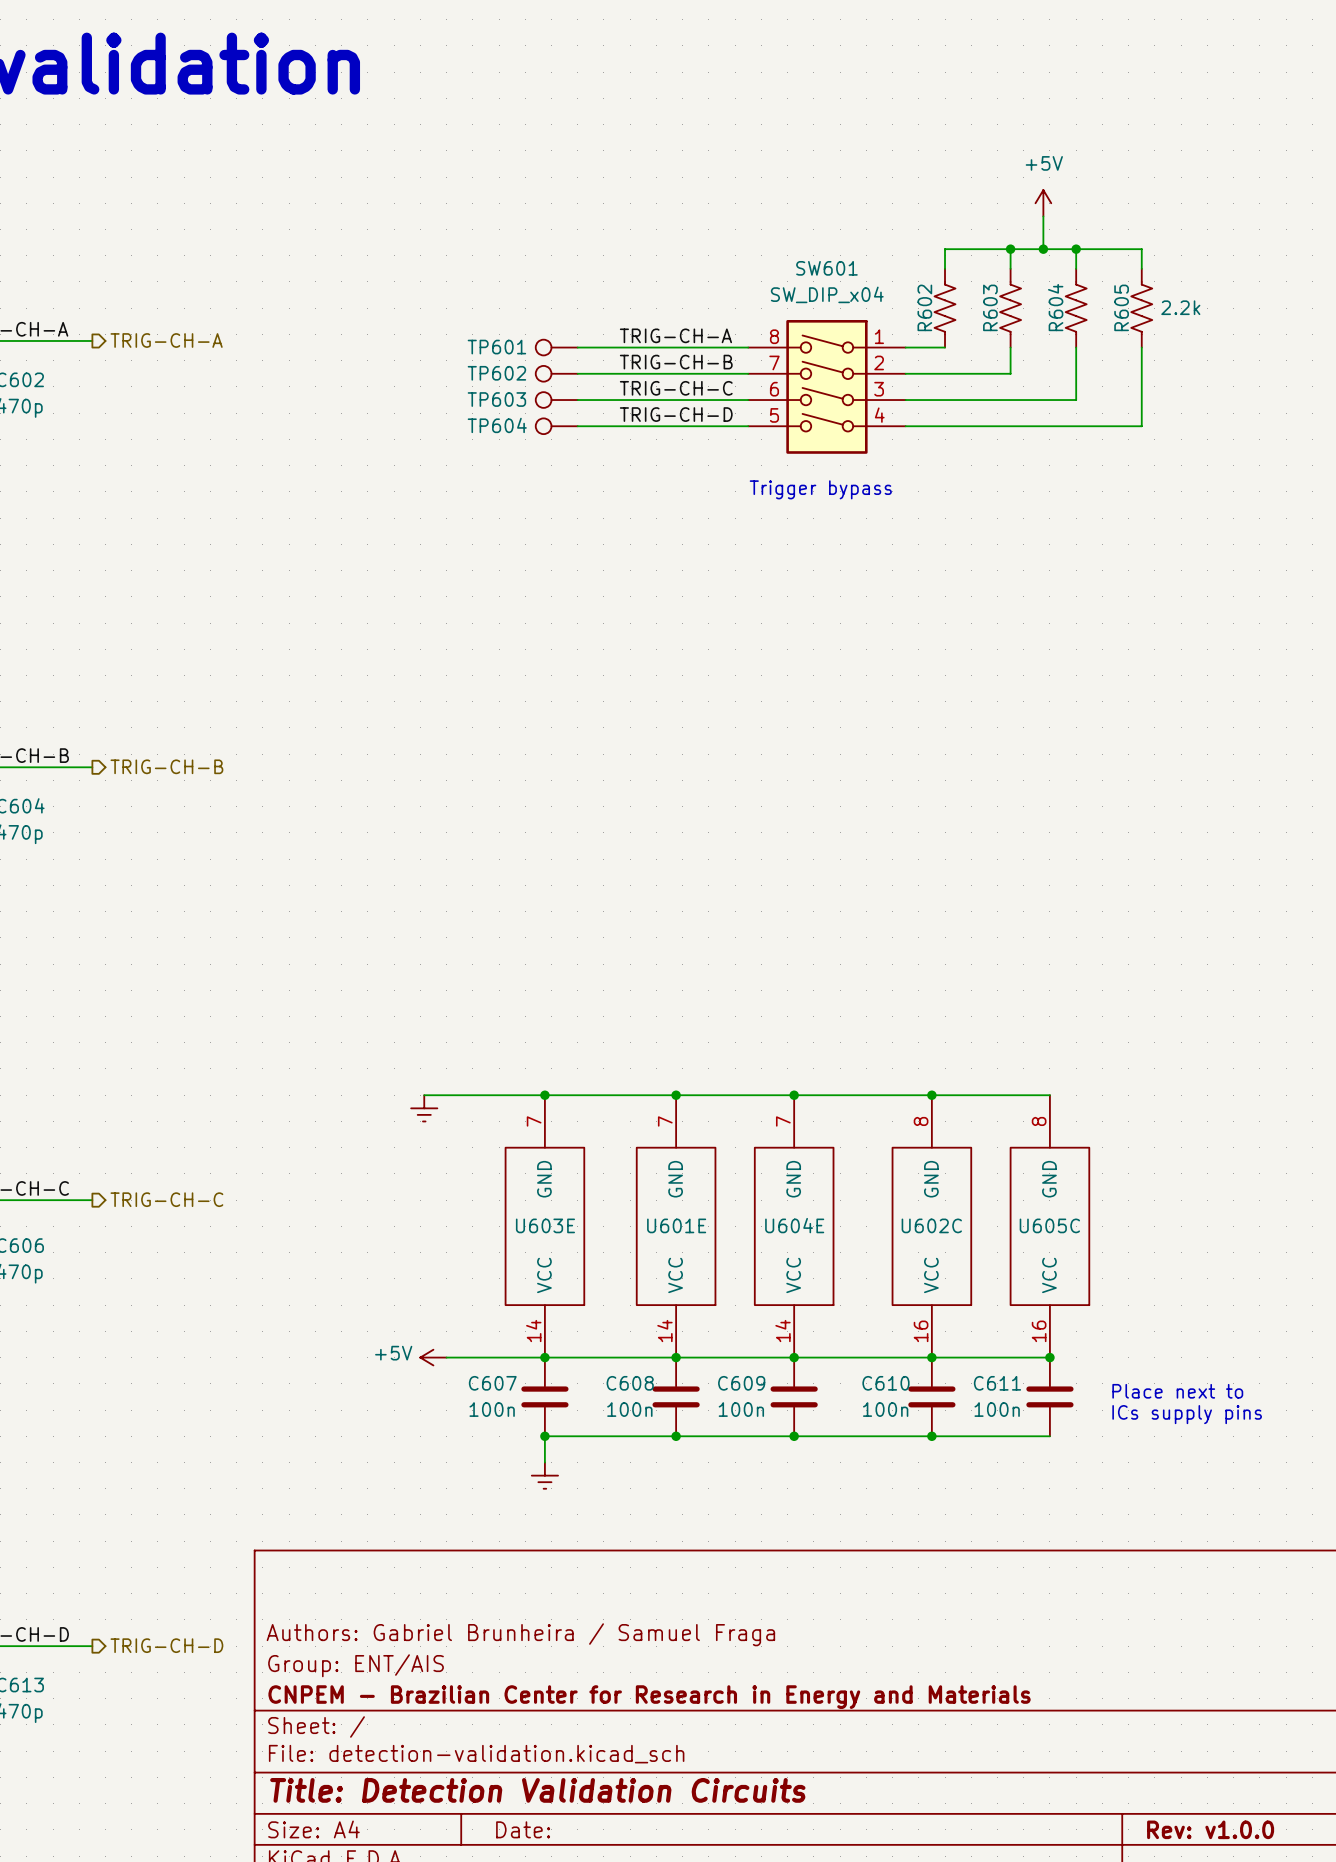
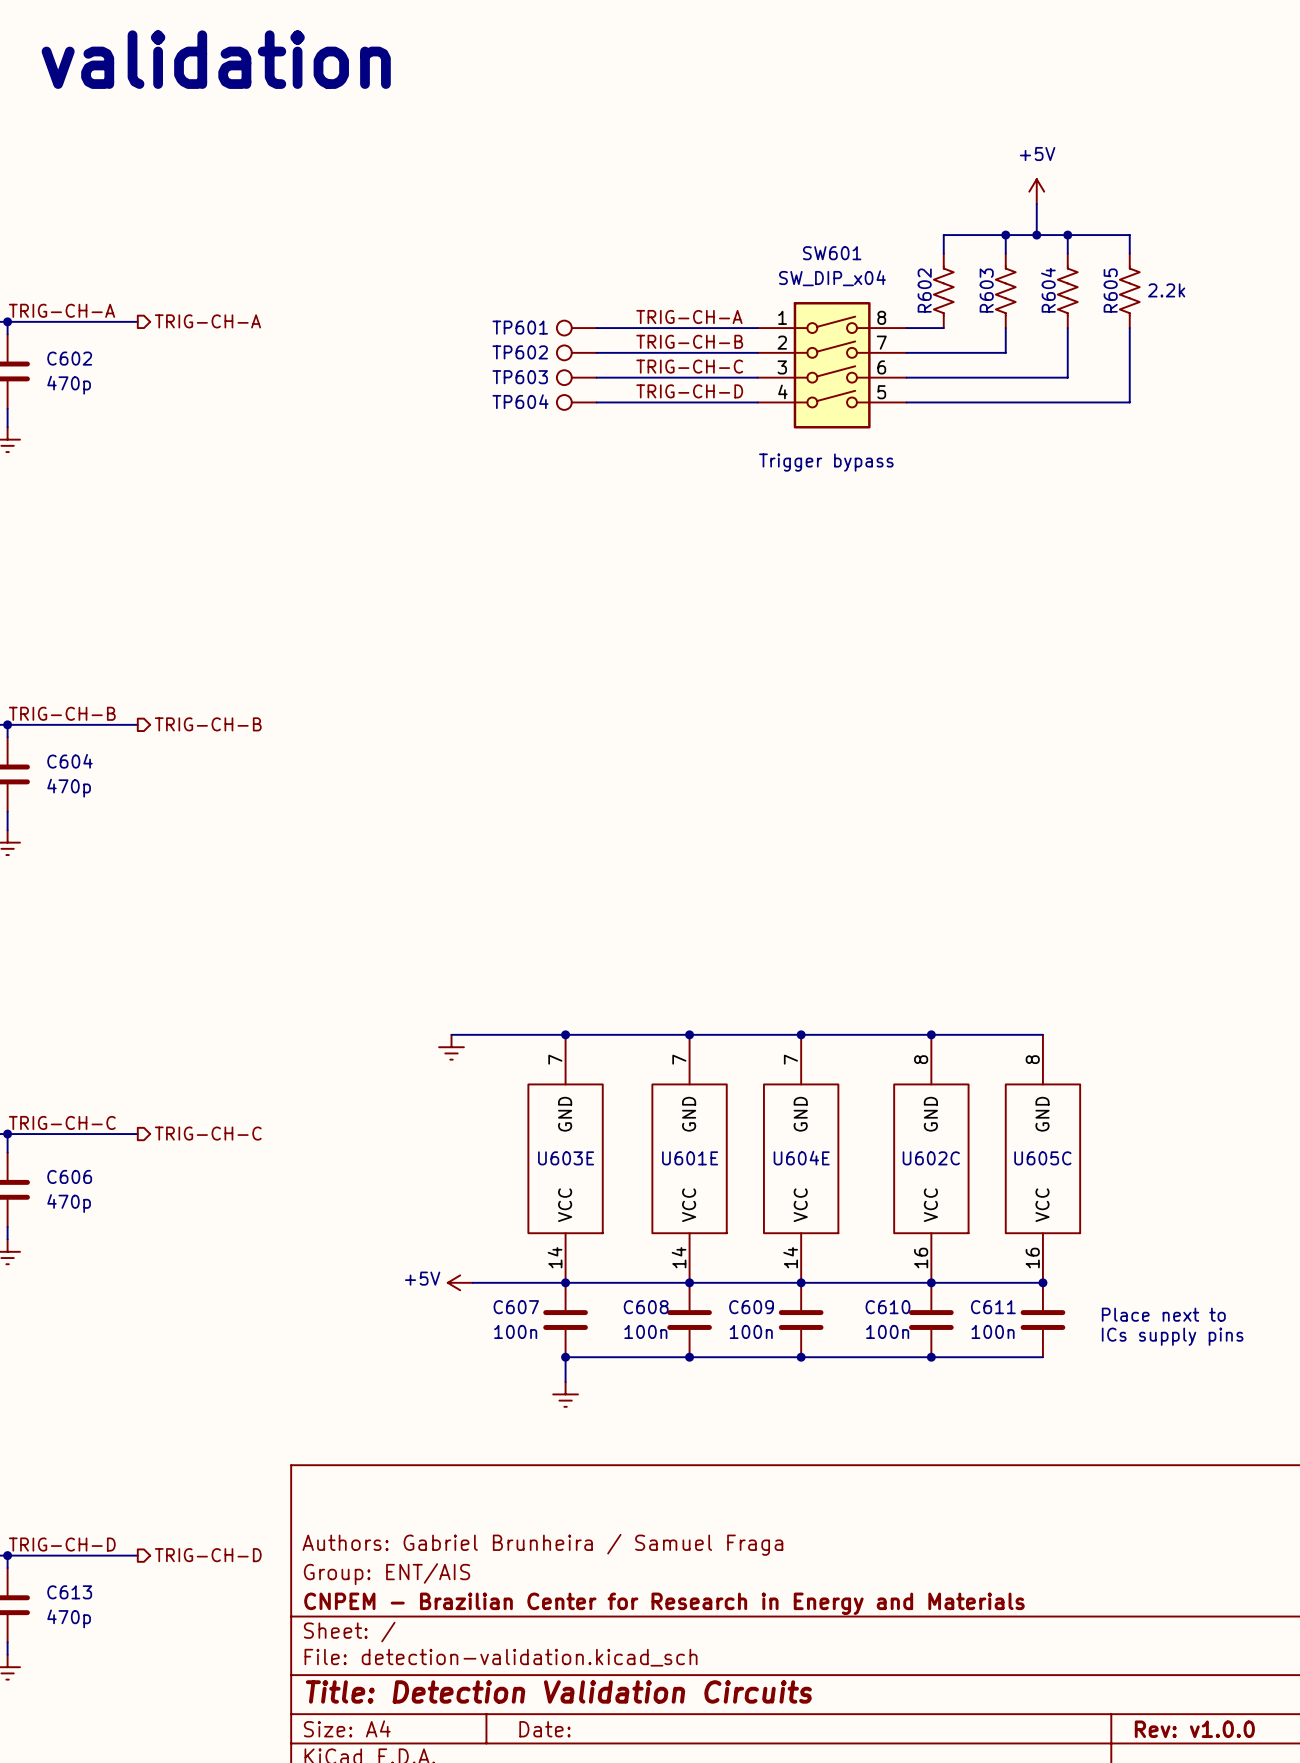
SW601 flip: as is (826, 386) -> left-right (832, 365)

